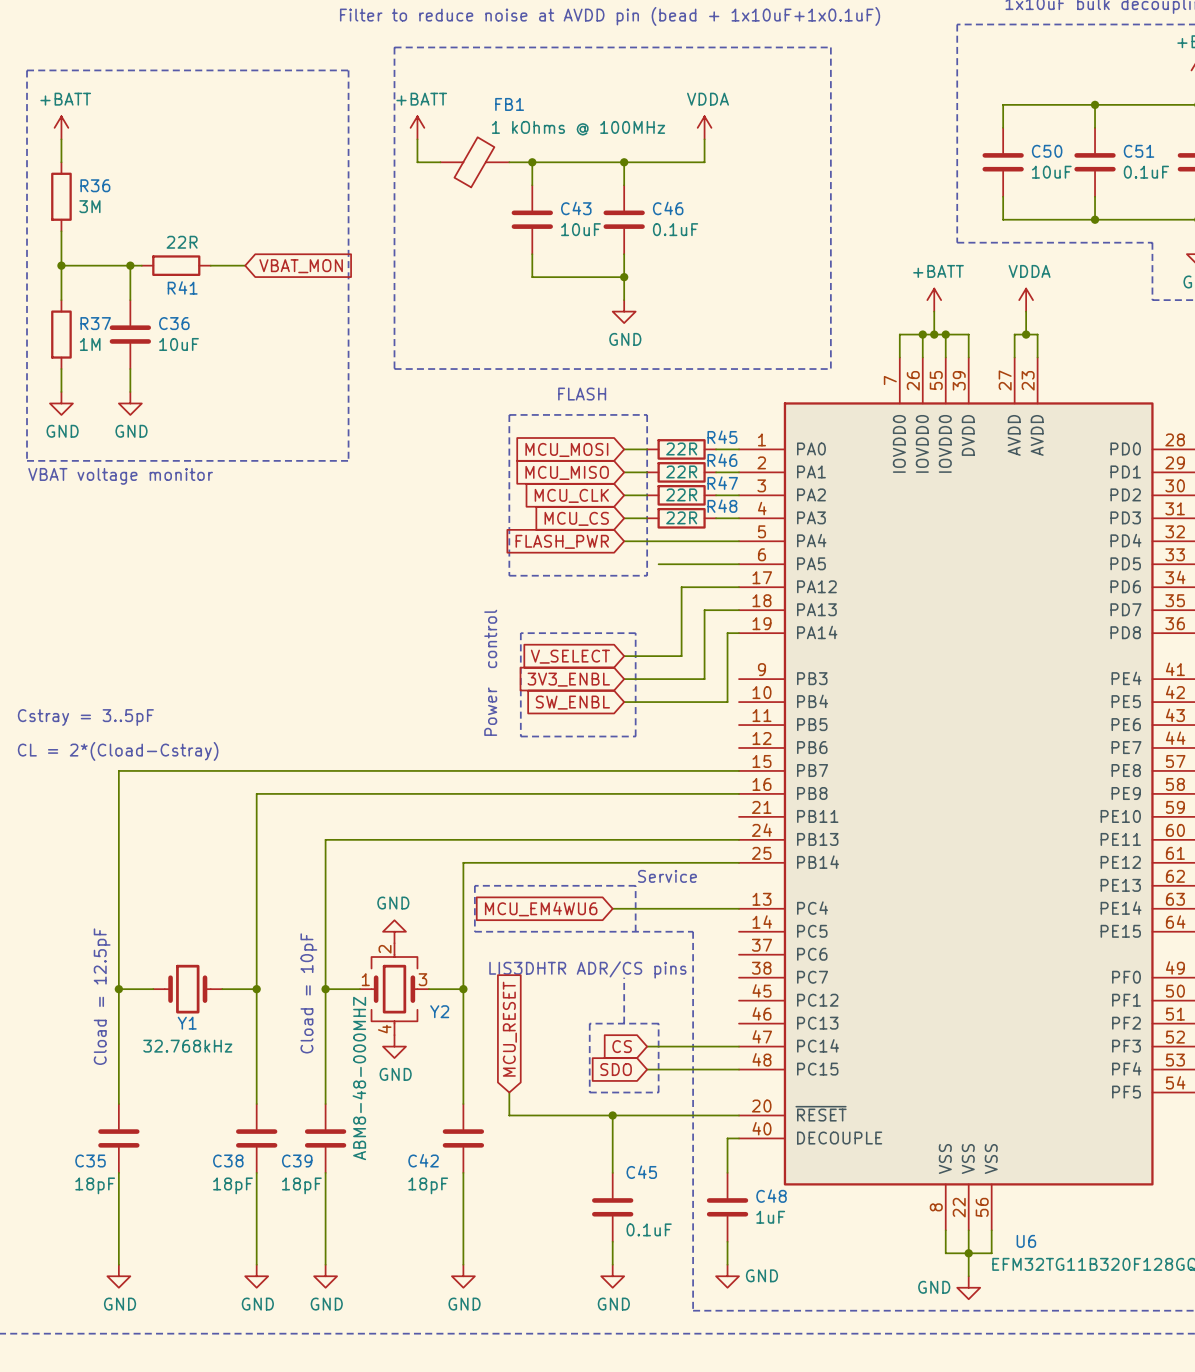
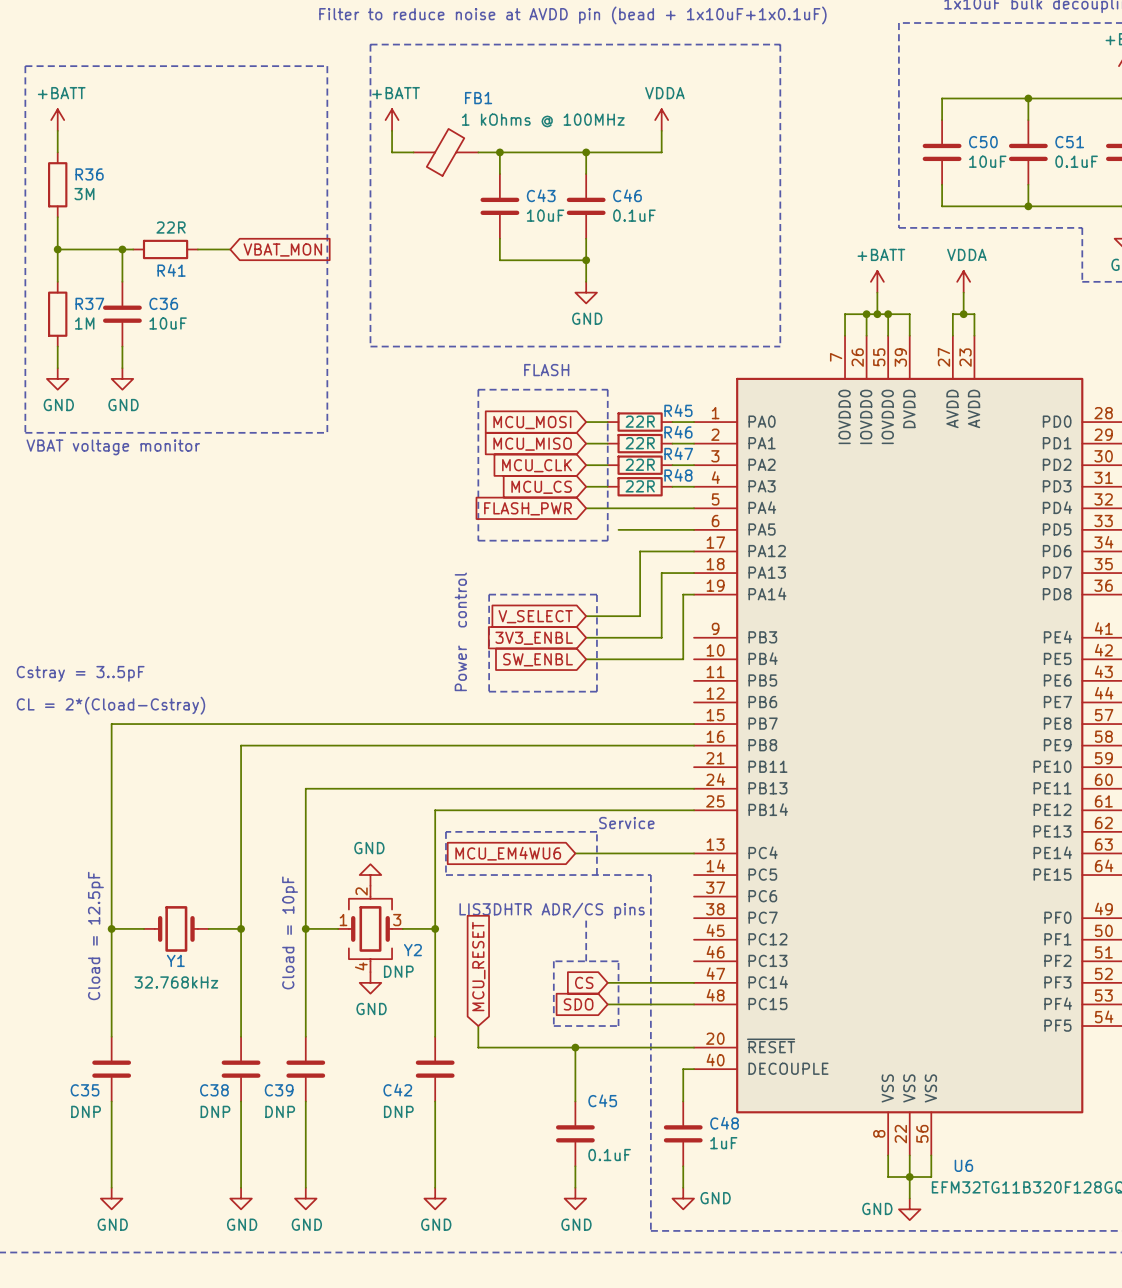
Y2 value: ABM8-48-000MHZ (359, 1078) -> DNP (398, 971)
C35 value: 18pF (95, 1185) -> DNP (86, 1111)
C38 value: 18pF (232, 1185) -> DNP (215, 1111)
C39 value: 18pF (301, 1185) -> DNP (280, 1111)
C42 value: 18pF (428, 1185) -> DNP (398, 1111)

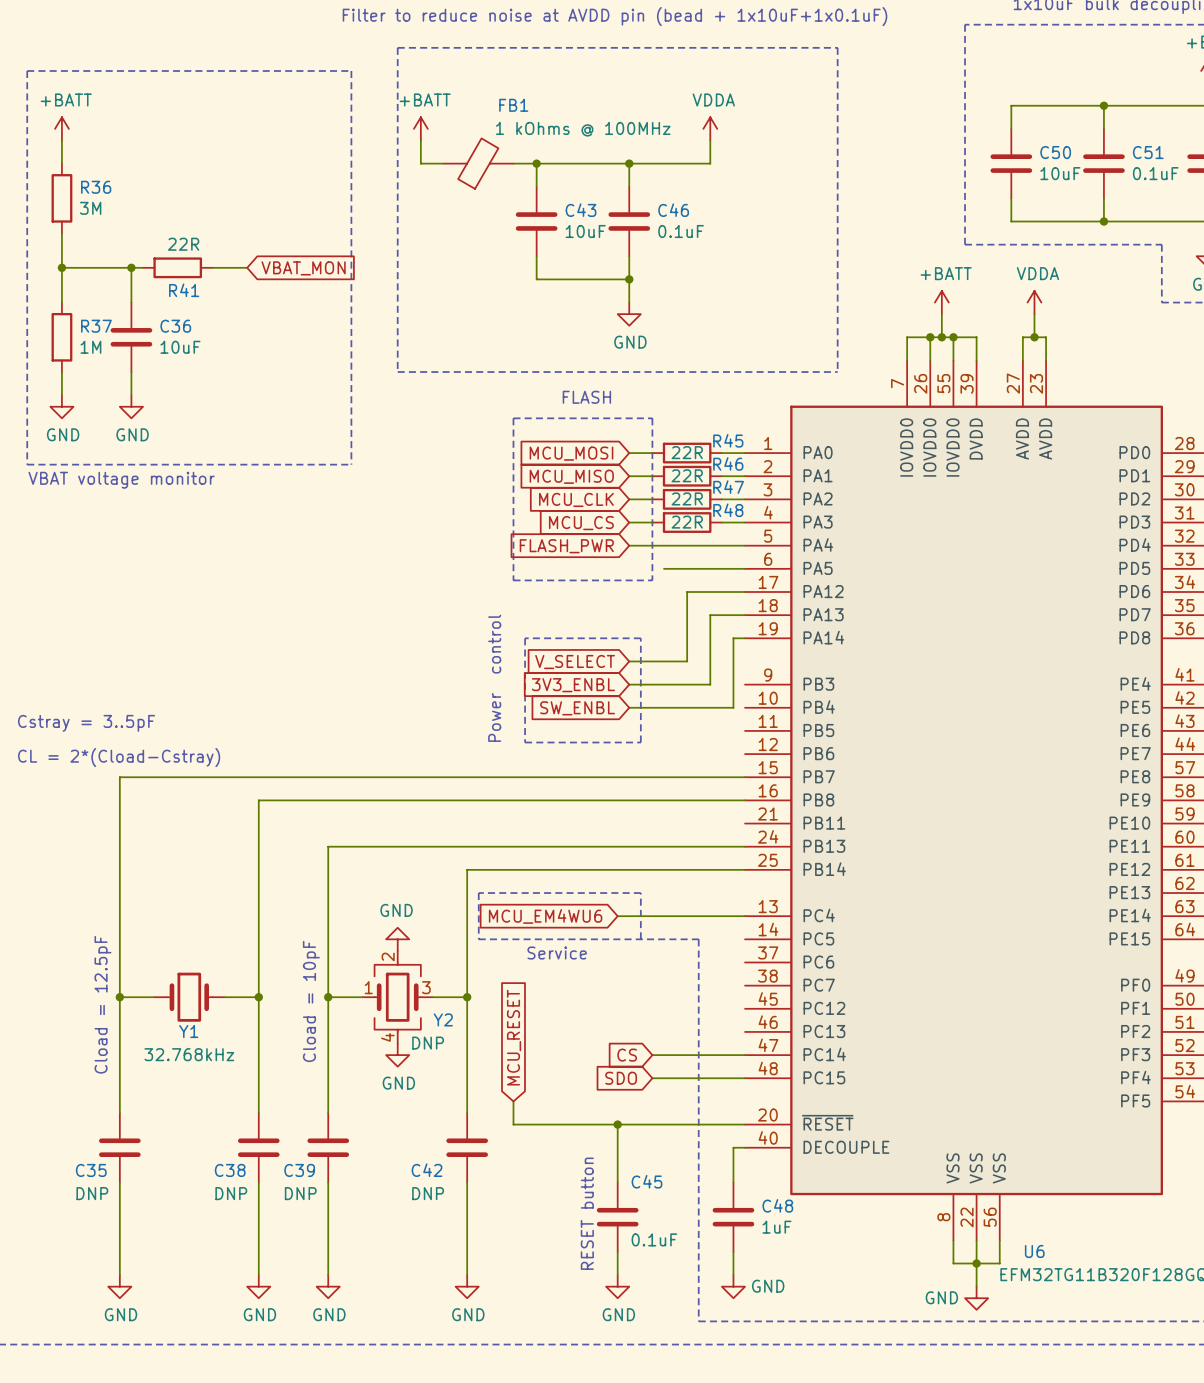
text position: Service (626, 823) -> Service (557, 953)
text: LIS3DHTR ADR/CS pins (552, 910) -> none
line: (586, 918) (586, 961) -> none
line: (553, 961) (553, 1026) (618, 1026) (618, 961) (553, 961) -> none
text: none -> RESET button (587, 1213)

